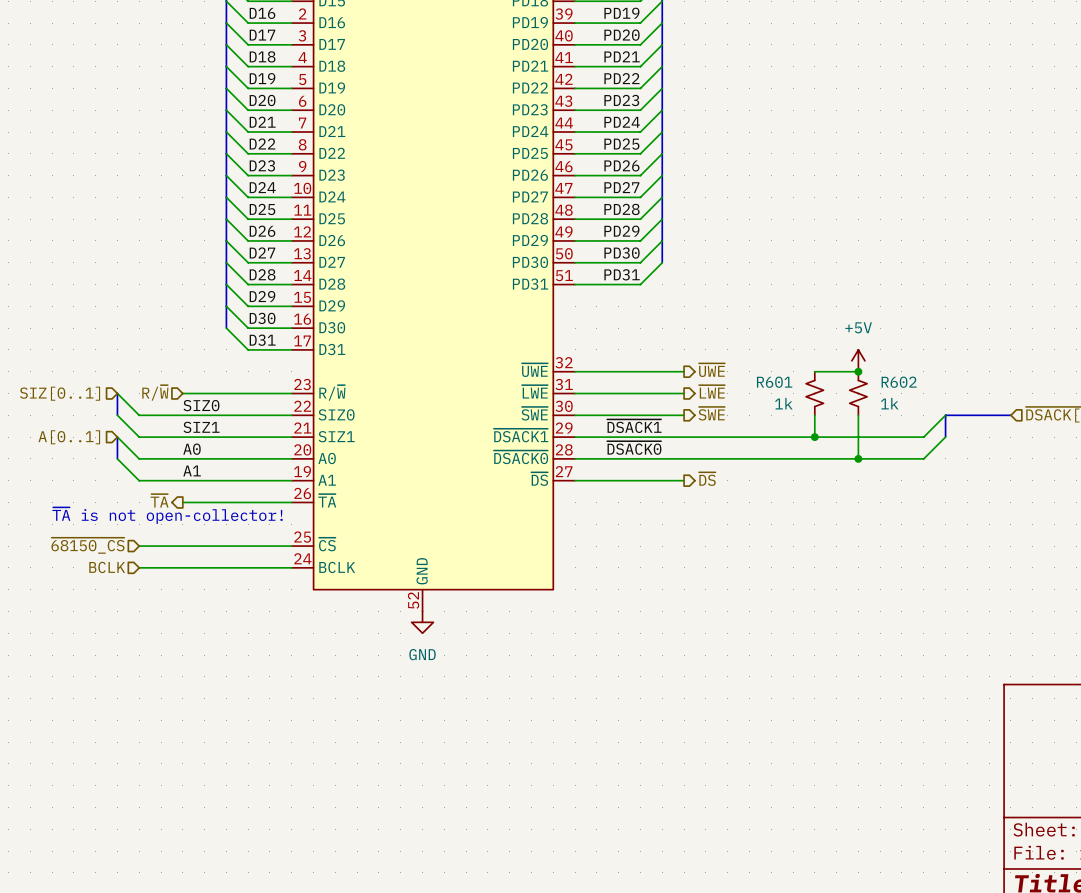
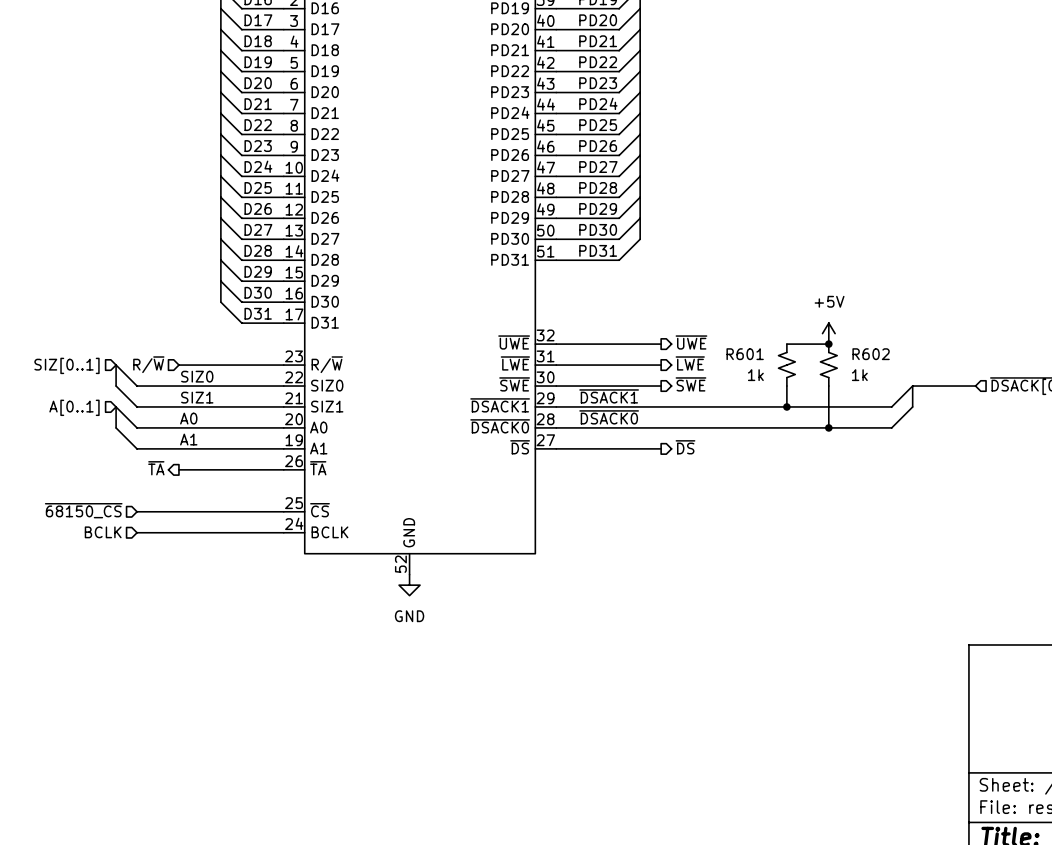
text: ~{TA} is not open-collector! (167, 515) -> none

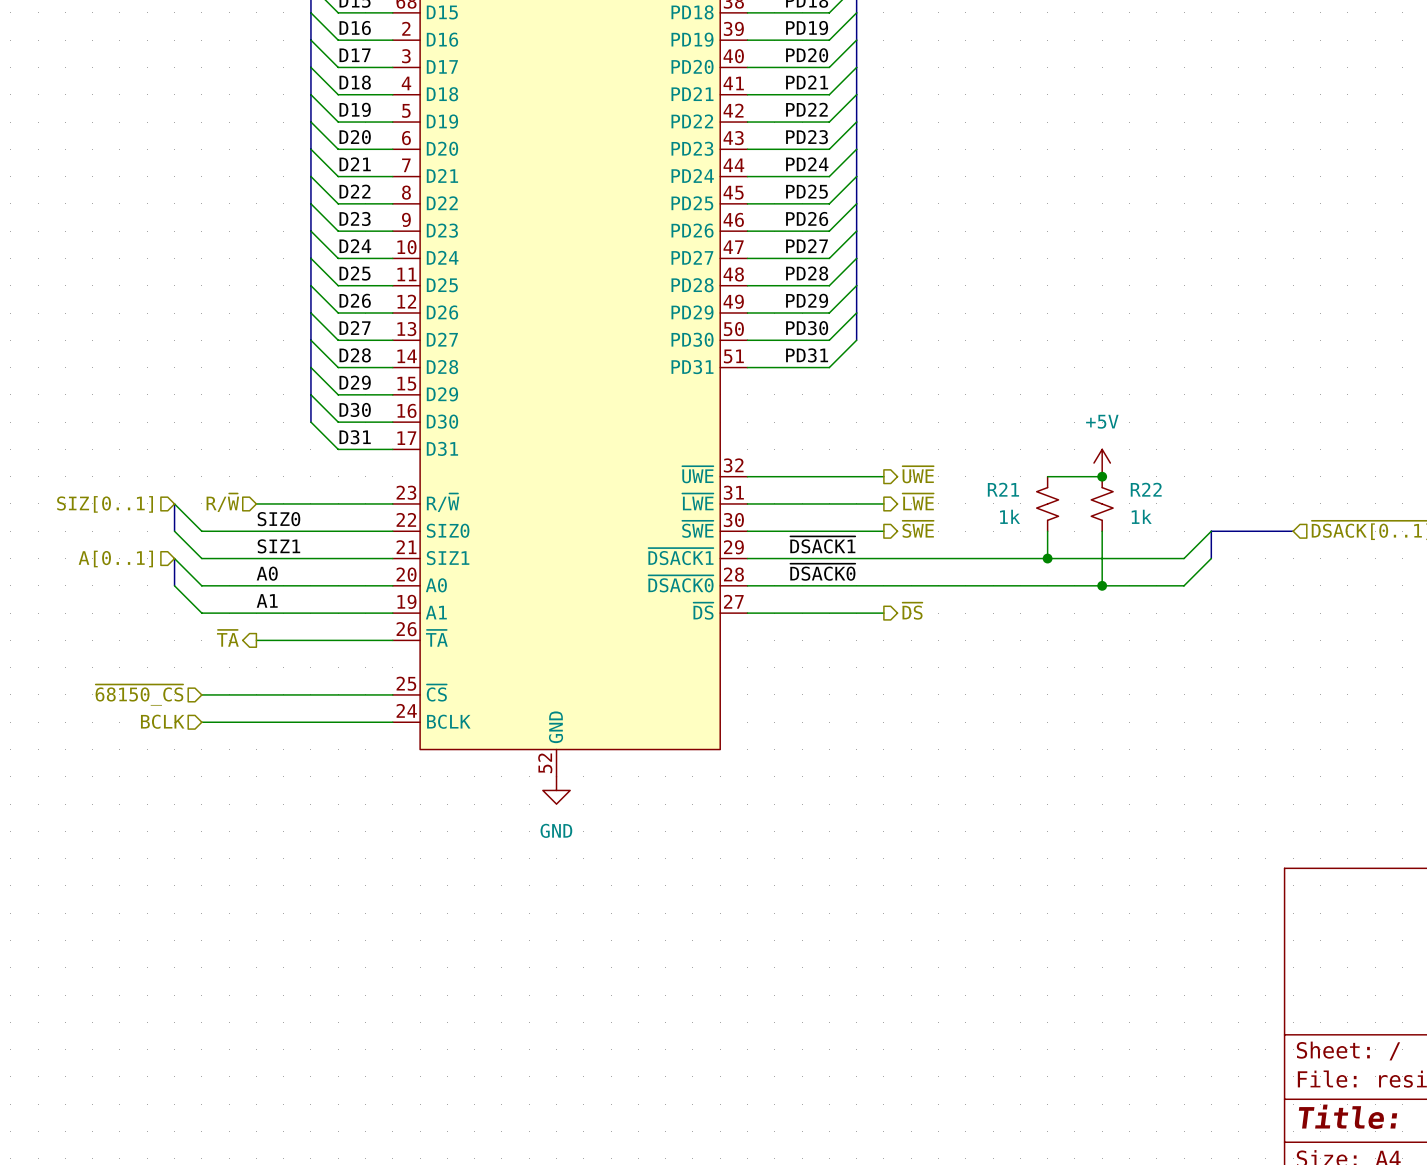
R601 name: R601 (745, 354) -> R21 (1003, 489)
R602 name: R602 (871, 354) -> R22 (1146, 489)

